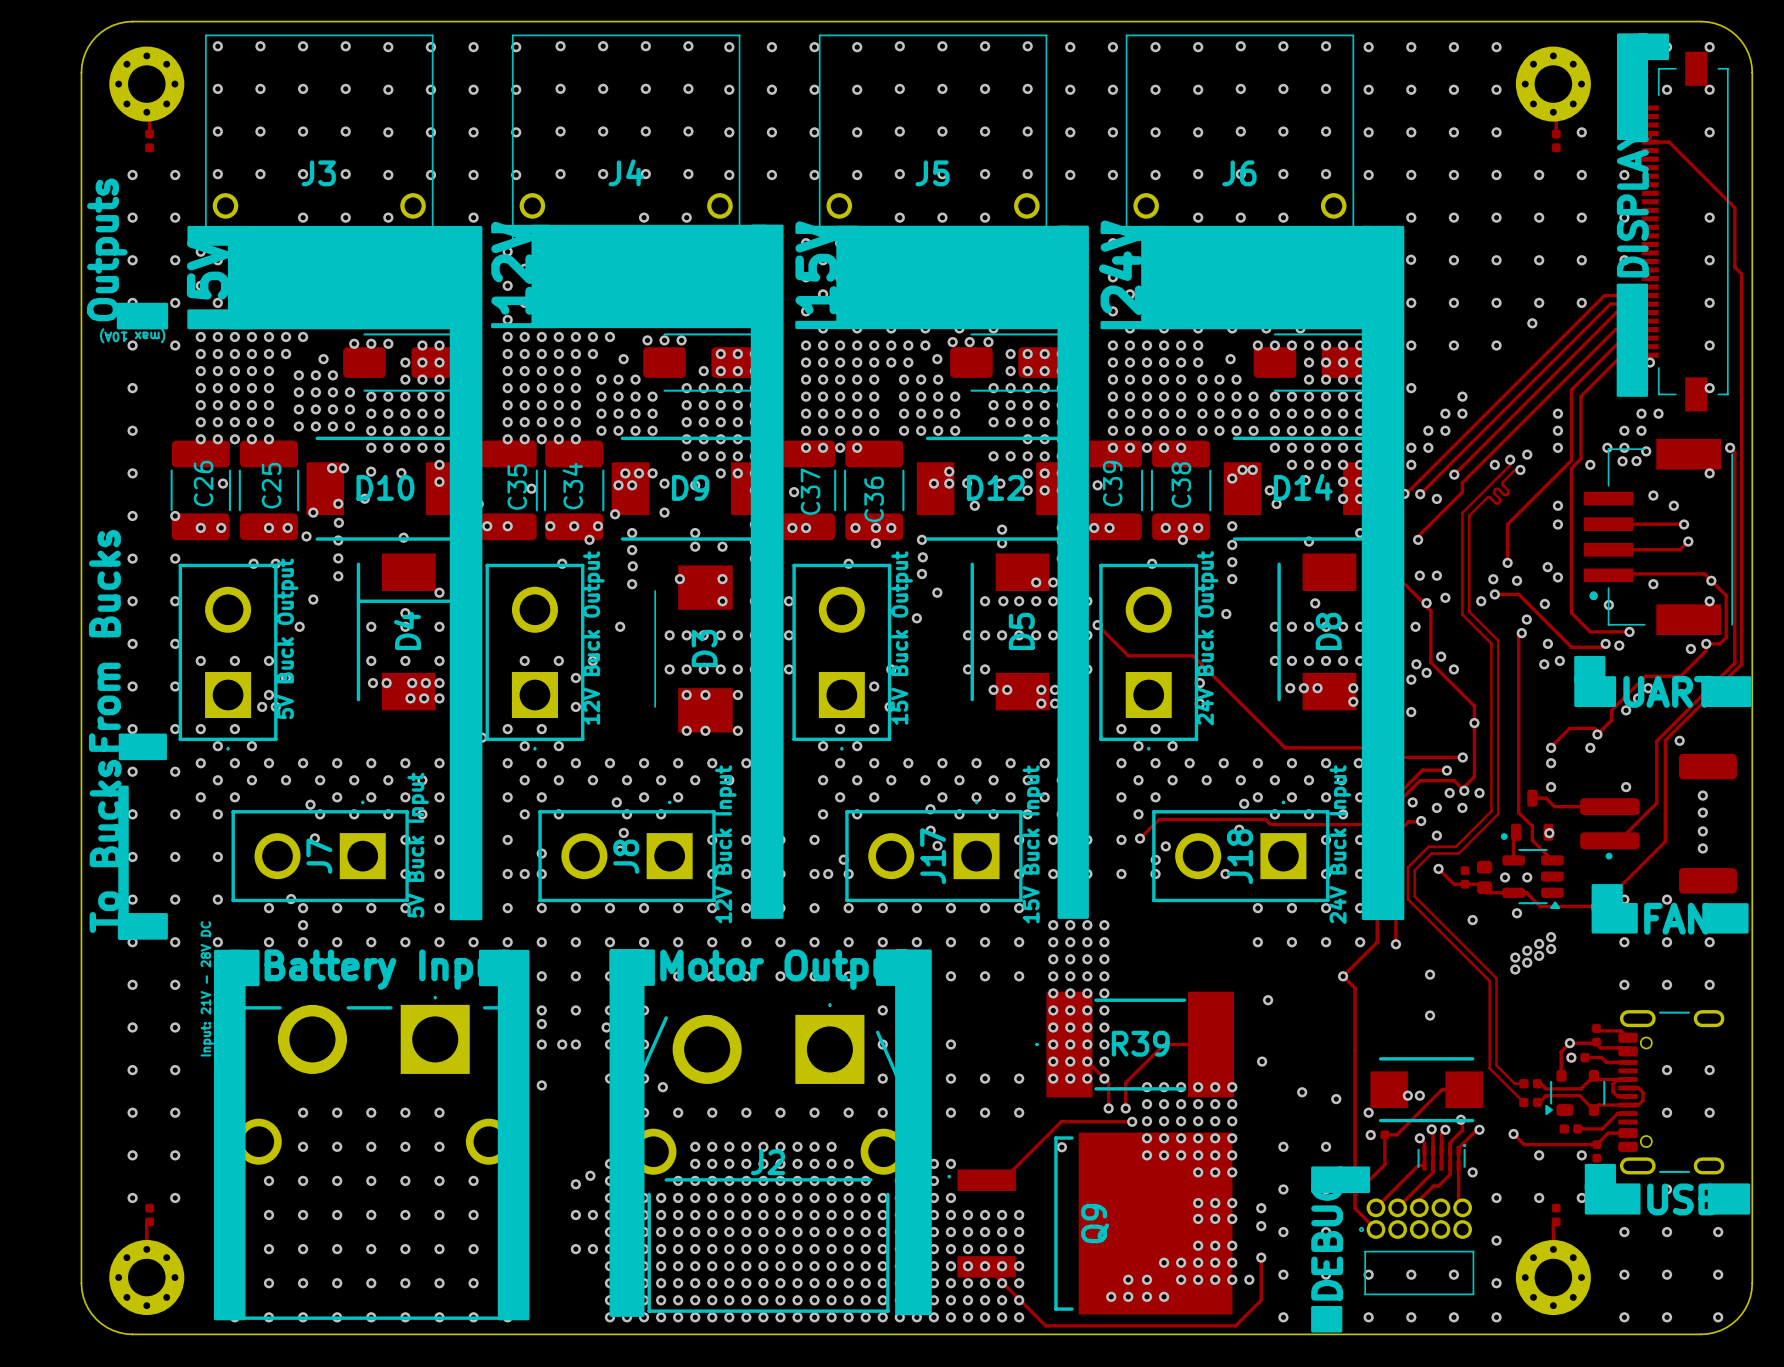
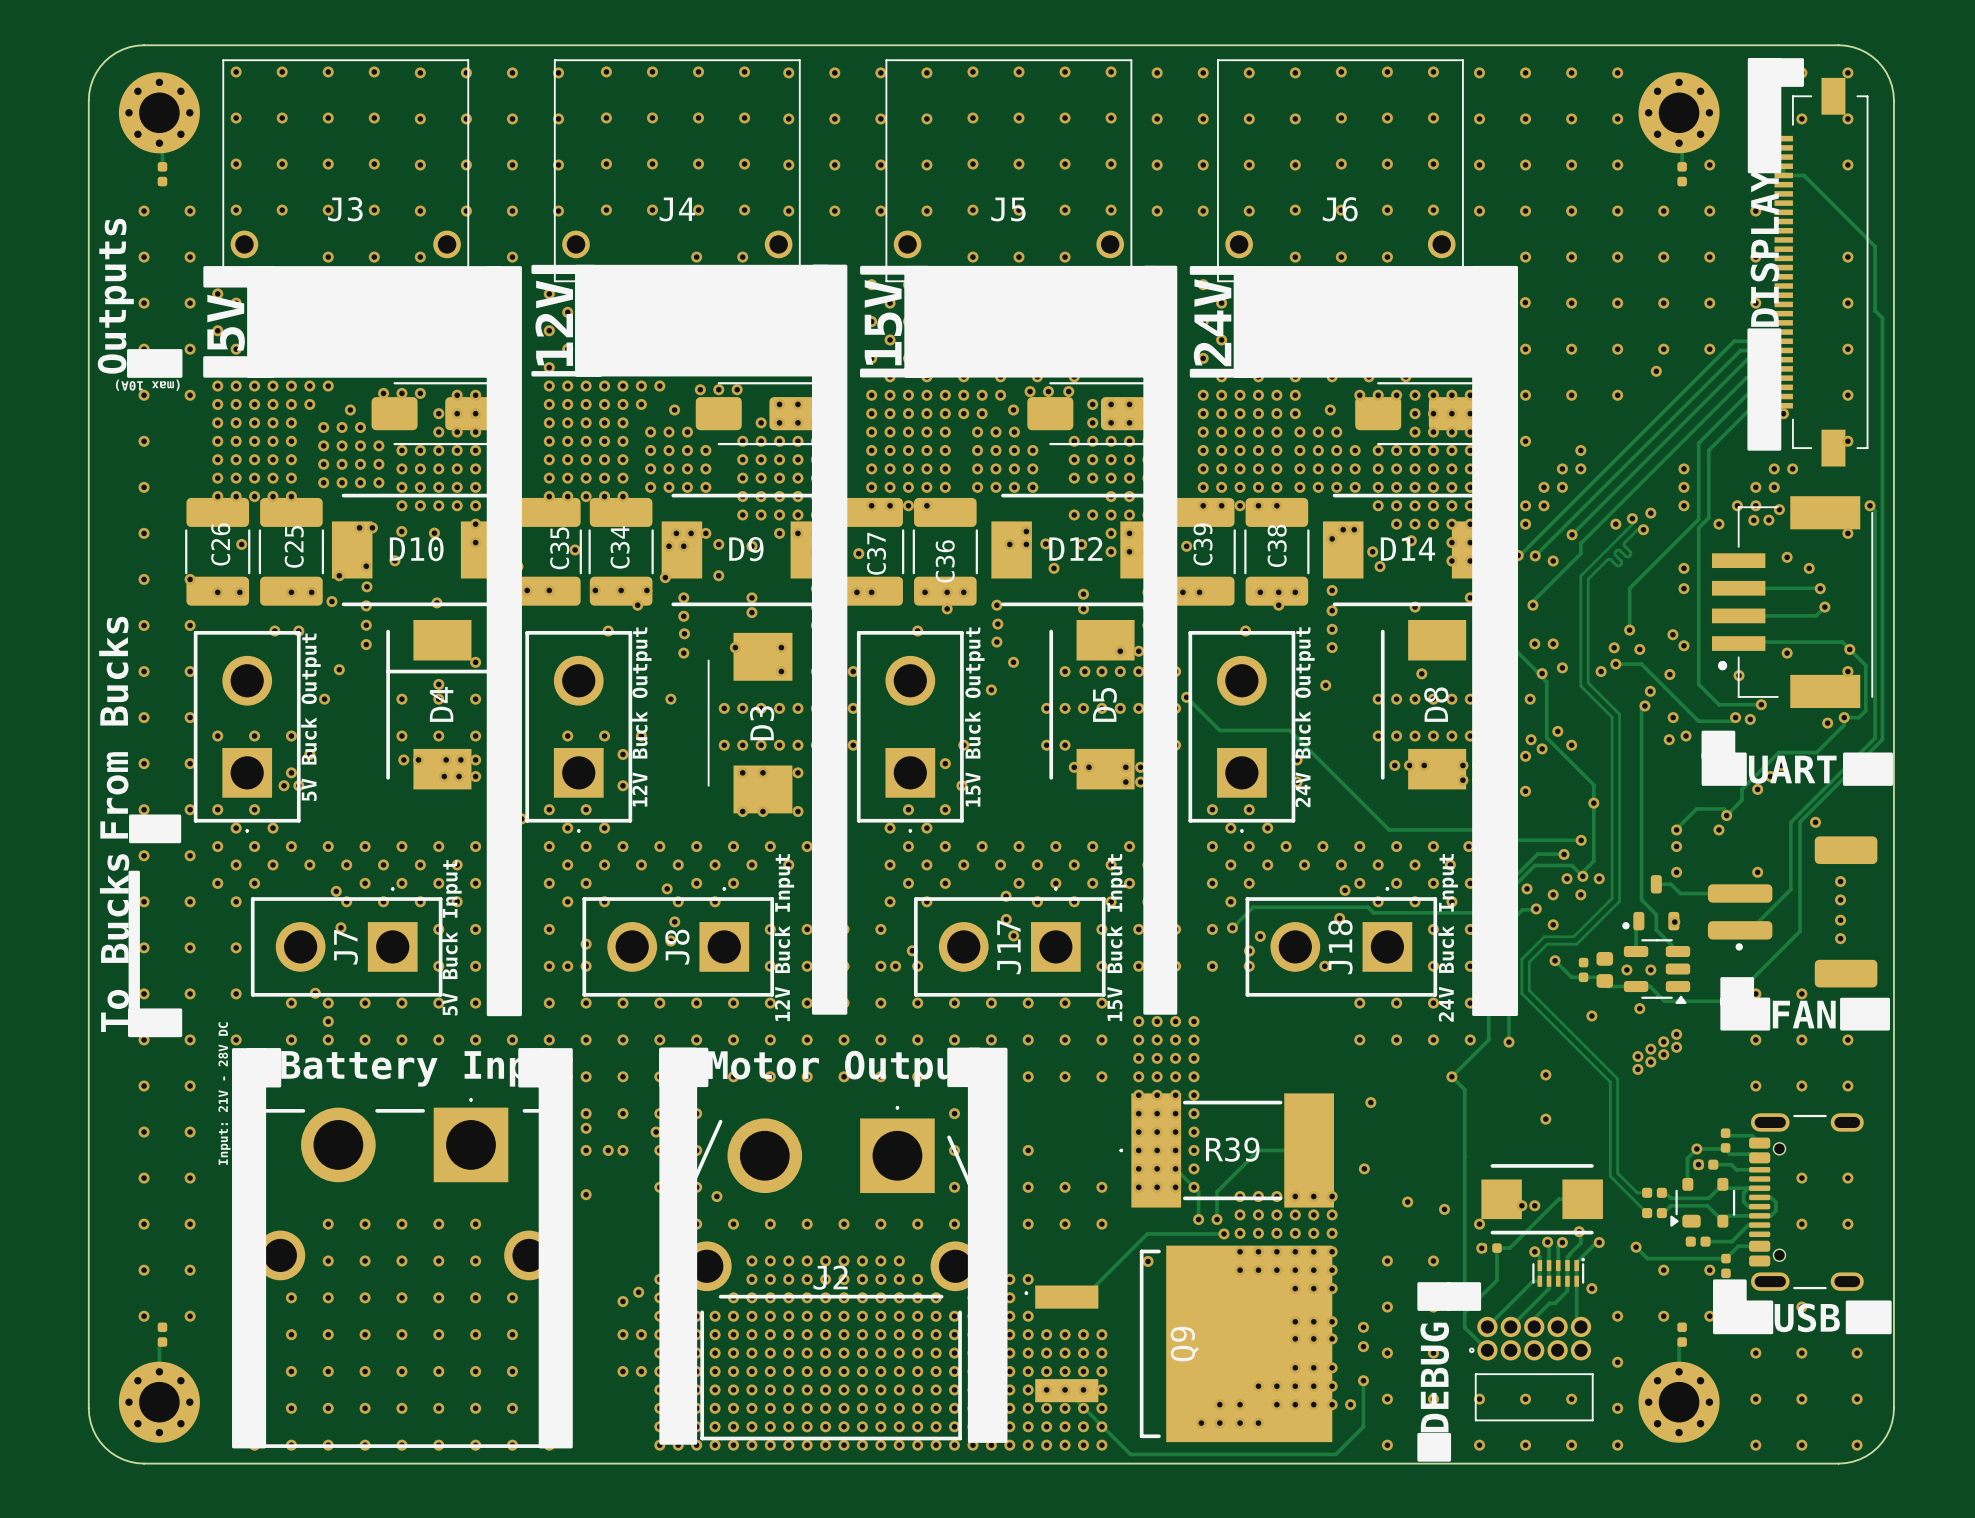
via: (722, 546) -> none

